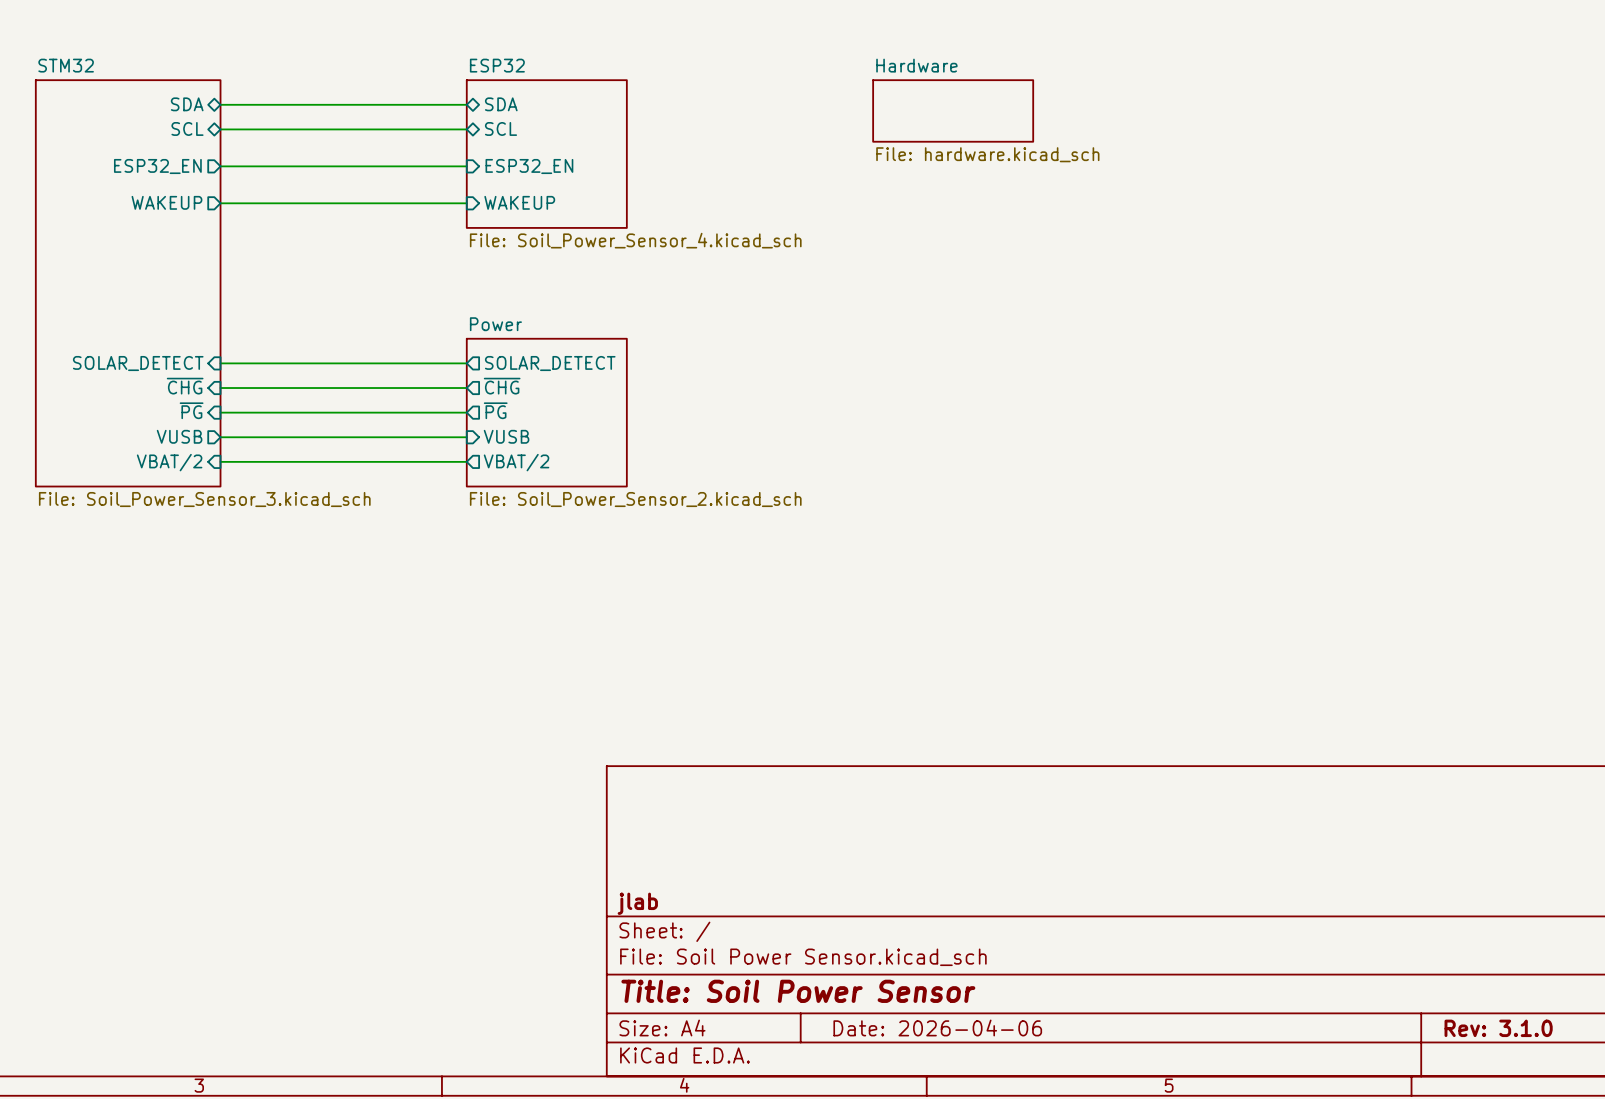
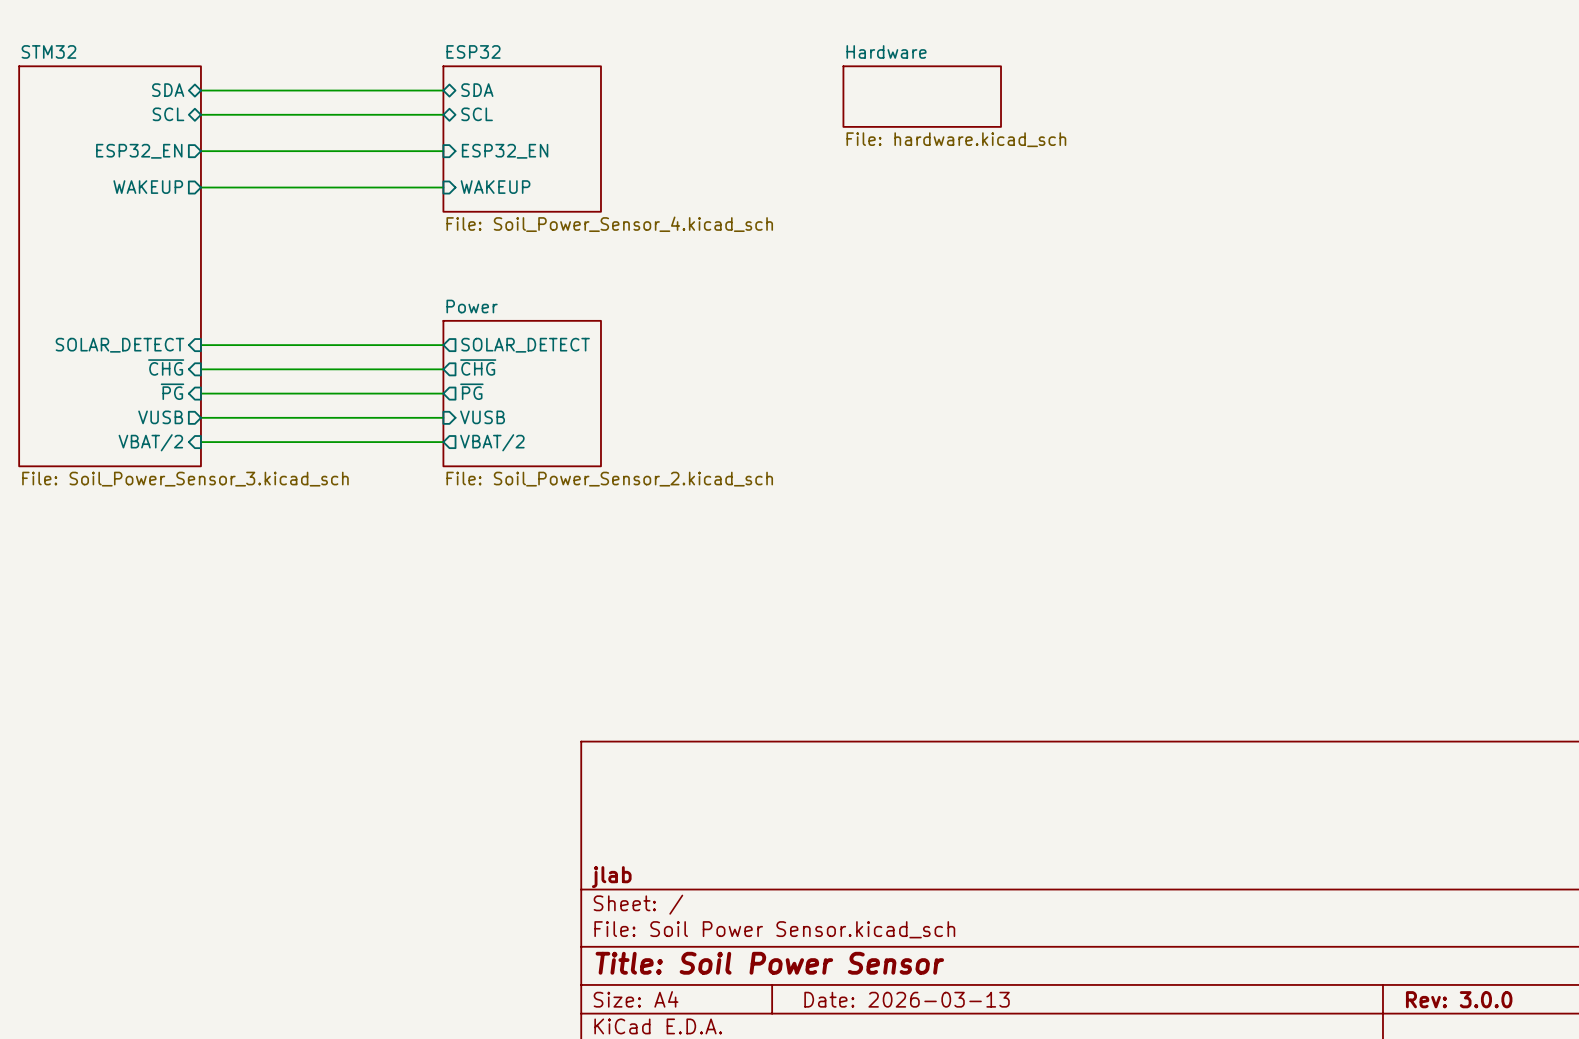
title block: Date: 2026-04-06 (937, 1027) -> Date: 2026-03-13 (907, 999)
title block: Rev: 3.1.0 (1498, 1028) -> Rev: 3.0.0 (1459, 999)

